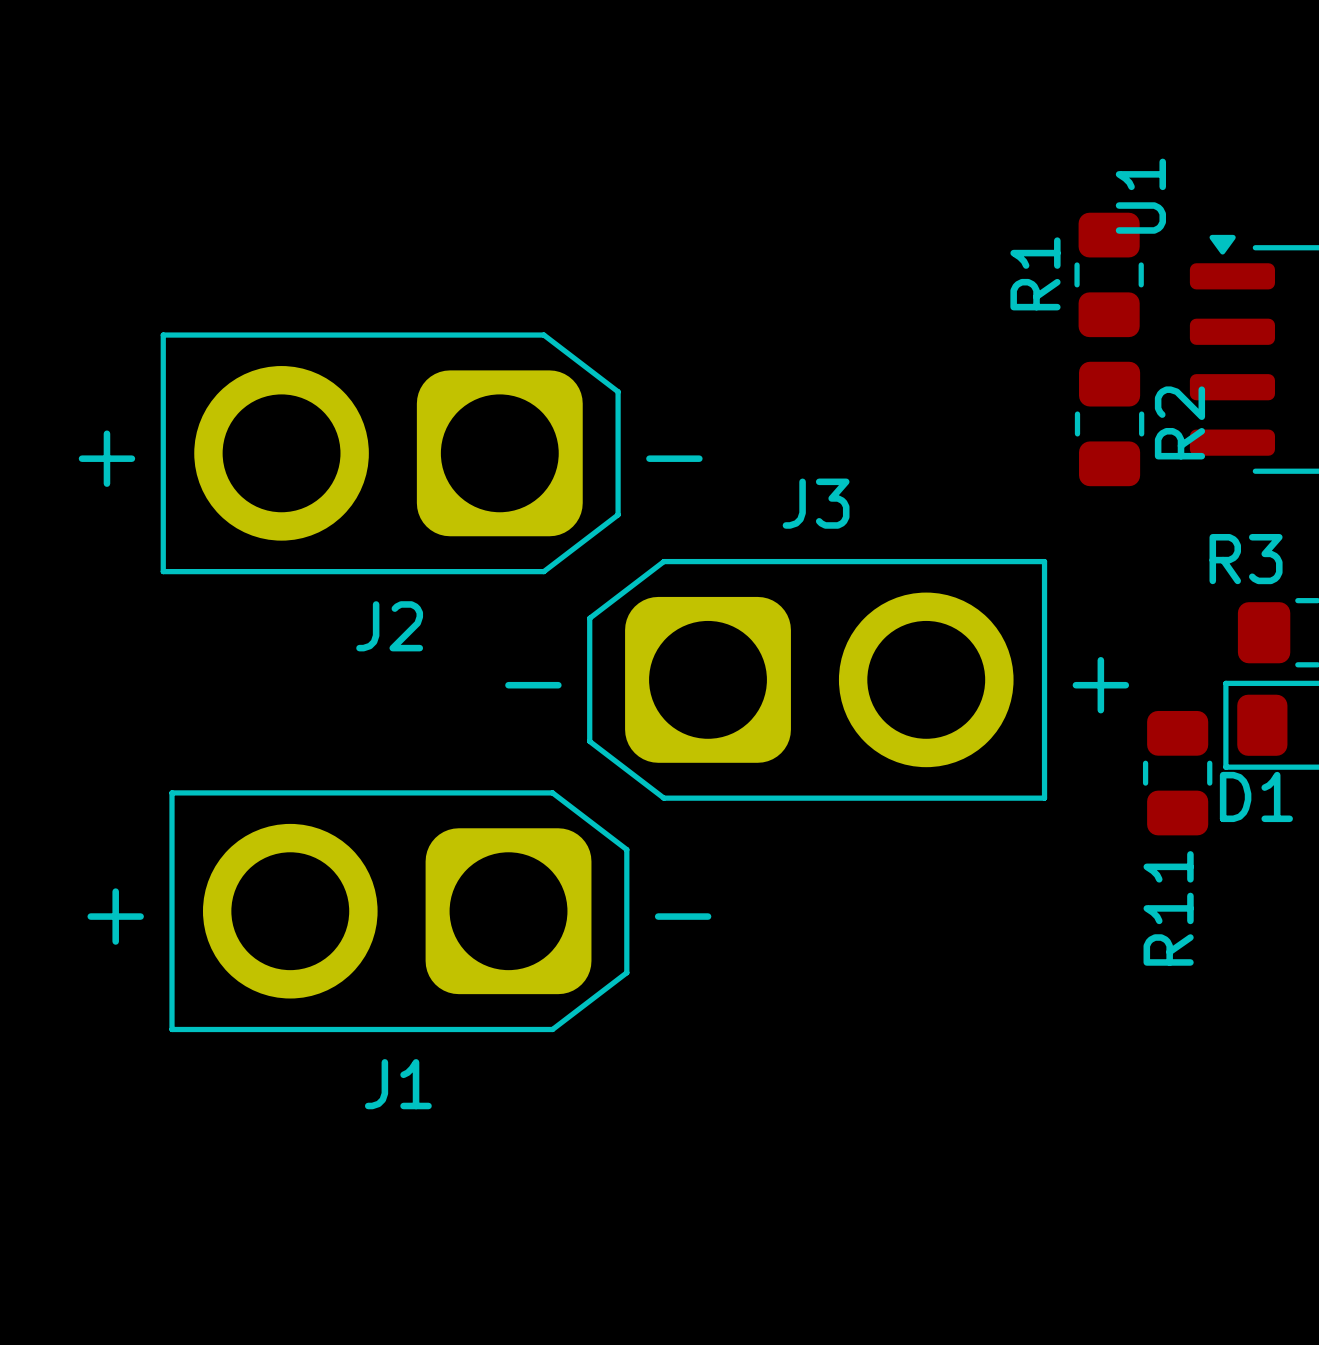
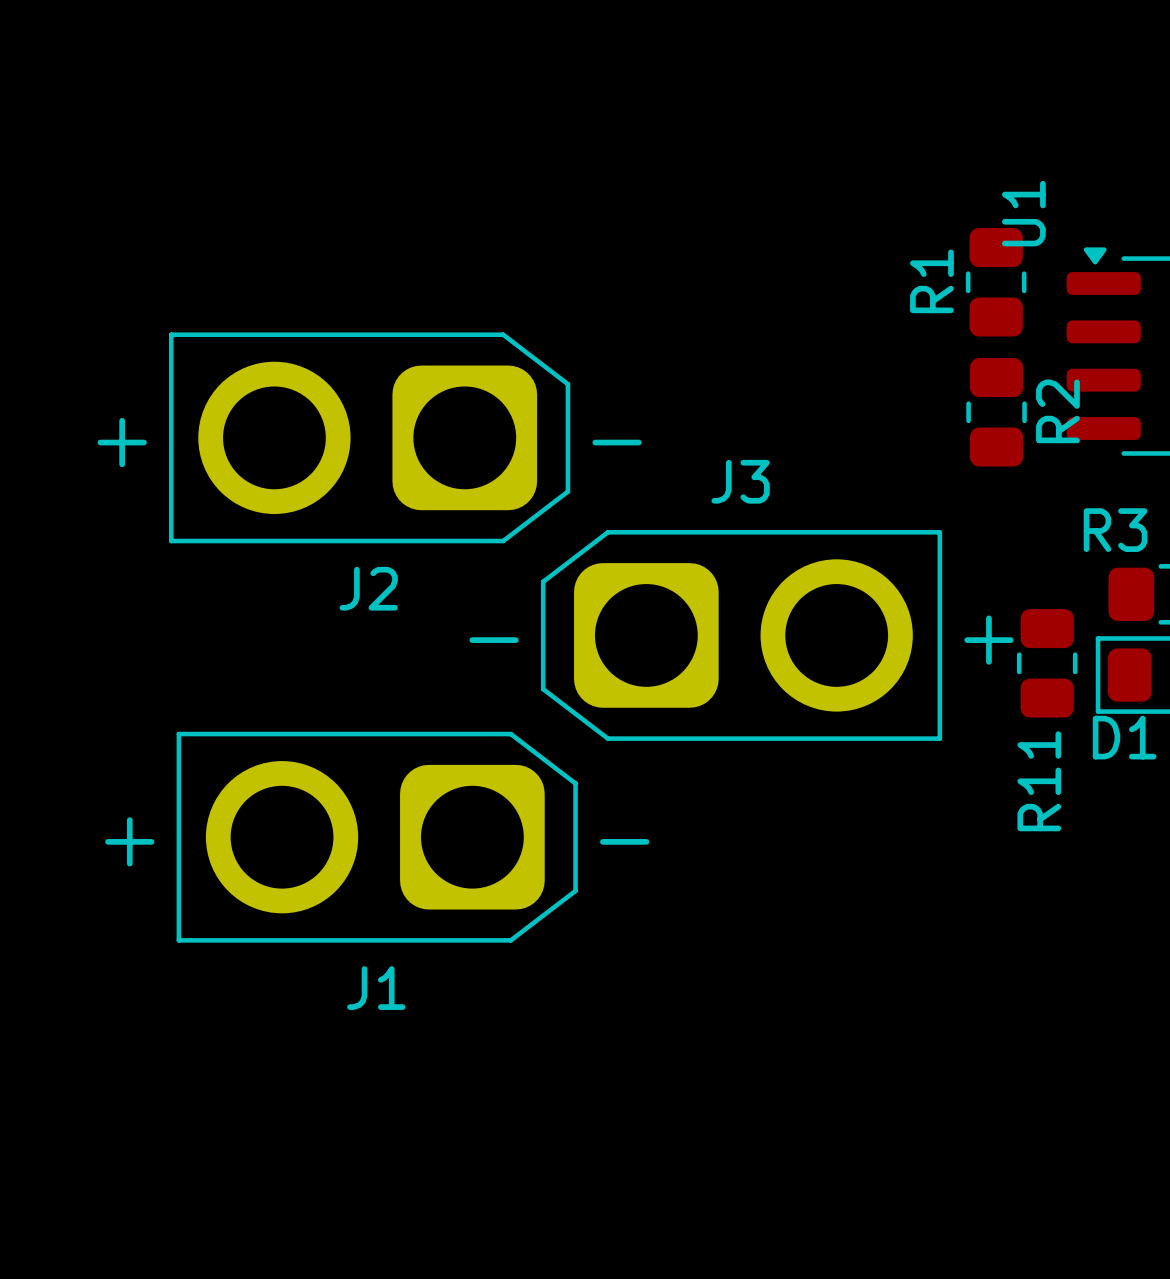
R11 position: (1177, 773) -> (1047, 663)

